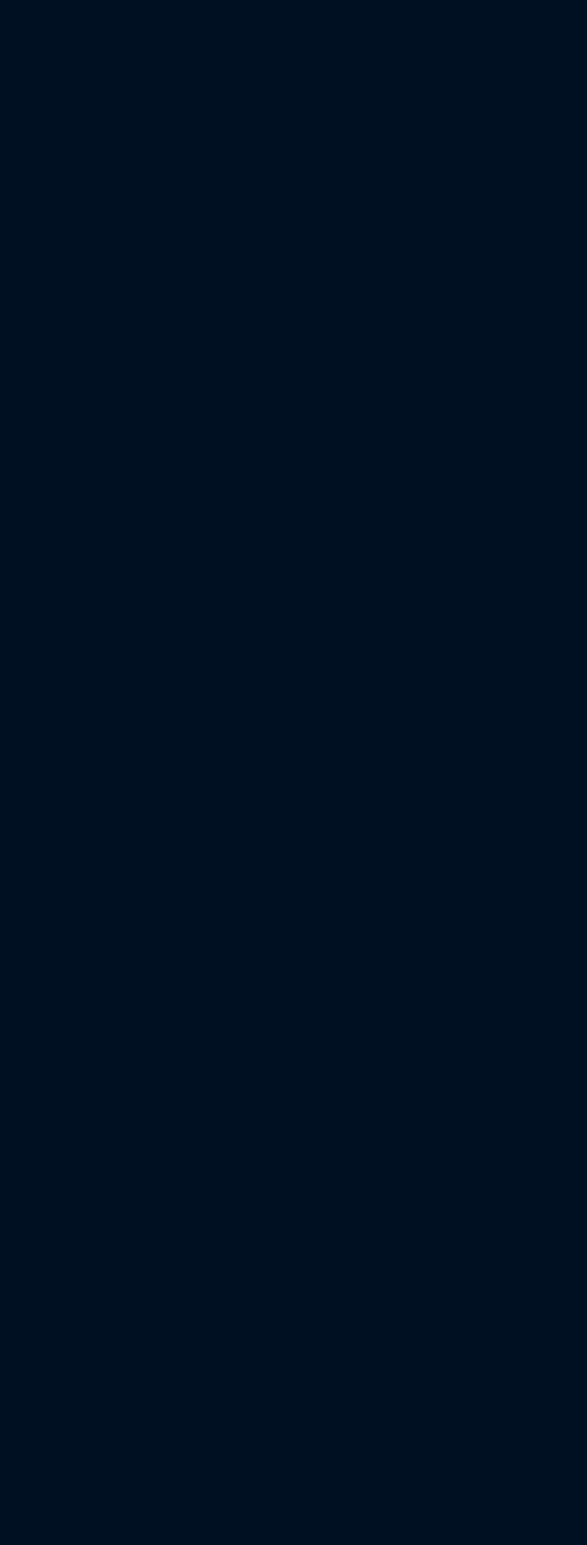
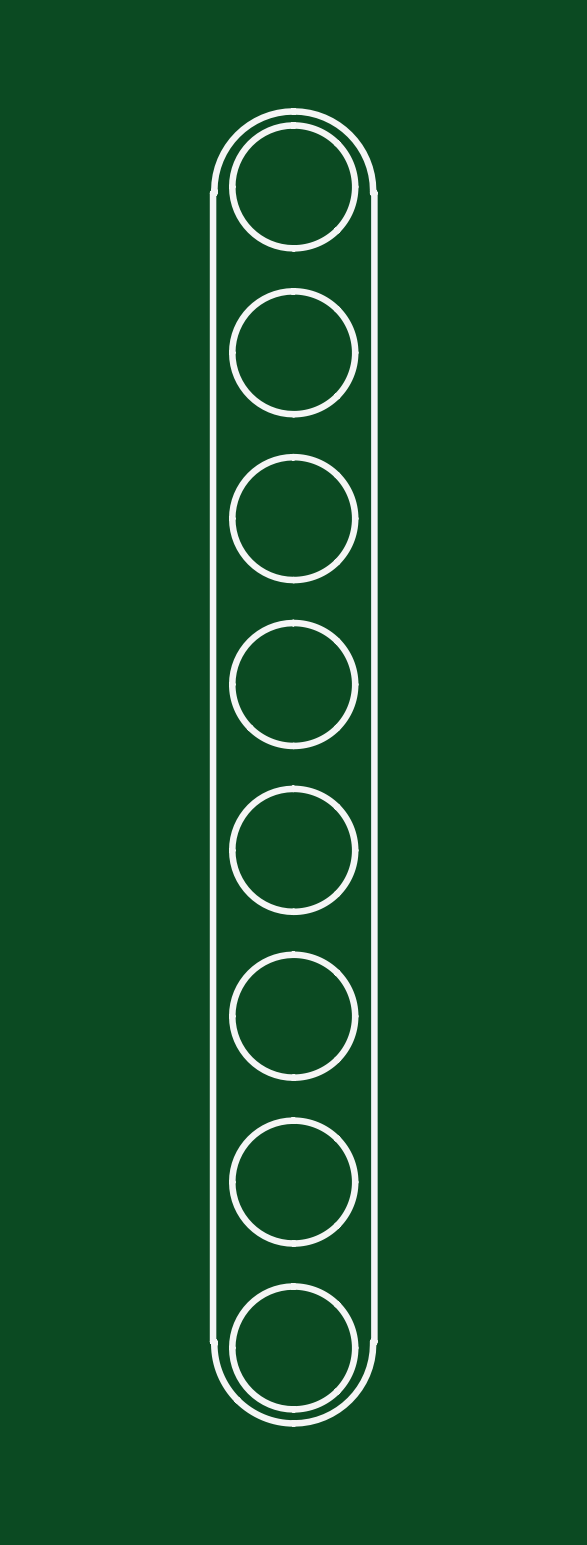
line: none -> (293, 125) (317, 130) (337, 143) (350, 163) (355, 186) (350, 210) (337, 230) (317, 243) (293, 248) (269, 243) (250, 230) (237, 210) (232, 186) (237, 163) (250, 143) (269, 130) (293, 125)
line: none -> (213, 193) (213, 1341)
line: none -> (214, 193) (215, 174) (220, 159) (237, 134) (262, 117) (277, 113) (293, 111) (309, 113) (324, 117) (349, 134) (366, 159) (371, 174) (373, 193)
line: none -> (374, 193) (374, 1341)
line: none -> (293, 291) (269, 296) (250, 309) (237, 328) (232, 352) (237, 376) (250, 396) (269, 409) (293, 414) (317, 409) (337, 396) (350, 376) (355, 352) (350, 329) (337, 309) (317, 295) (293, 291)
line: none -> (293, 457) (269, 462) (250, 475) (237, 494) (232, 518) (237, 542) (250, 562) (269, 575) (293, 580) (317, 575) (337, 562) (350, 542) (355, 518) (350, 495) (337, 475) (317, 461) (293, 457)
line: none -> (293, 623) (269, 628) (250, 641) (237, 660) (232, 684) (236, 707) (250, 727) (270, 741) (293, 745) (317, 741) (337, 727) (350, 708) (355, 684) (350, 660) (337, 641) (317, 627) (293, 623)
line: none -> (293, 788) (269, 793) (250, 807) (237, 826) (232, 850) (237, 874) (250, 893) (269, 906) (293, 911) (317, 907) (337, 893) (350, 873) (355, 850) (350, 826) (337, 806) (317, 793) (293, 788)
line: none -> (293, 954) (269, 959) (250, 972) (237, 992) (232, 1016) (237, 1040) (250, 1059) (269, 1072) (293, 1077) (317, 1073) (337, 1059) (350, 1039) (355, 1016) (350, 992) (337, 972) (317, 959) (293, 954)
line: none -> (293, 1120) (269, 1125) (250, 1138) (237, 1158) (232, 1182) (237, 1206) (250, 1225) (269, 1238) (293, 1243) (317, 1238) (337, 1225) (350, 1205) (355, 1182) (350, 1158) (337, 1138) (317, 1125) (293, 1120)
line: none -> (293, 1286) (269, 1291) (250, 1304) (237, 1324) (232, 1347) (237, 1371) (250, 1391) (269, 1404) (293, 1409) (317, 1404) (337, 1391) (350, 1371) (355, 1347) (350, 1324) (337, 1304) (317, 1291) (305, 1287) (299, 1286) (296, 1286) (293, 1286) (293, 1286) (293, 1286)
line: none -> (214, 1341) (215, 1359) (220, 1374) (227, 1388) (237, 1400) (249, 1410) (263, 1417) (278, 1421) (293, 1423) (309, 1421) (324, 1417) (349, 1400) (366, 1374) (371, 1360) (373, 1341)

